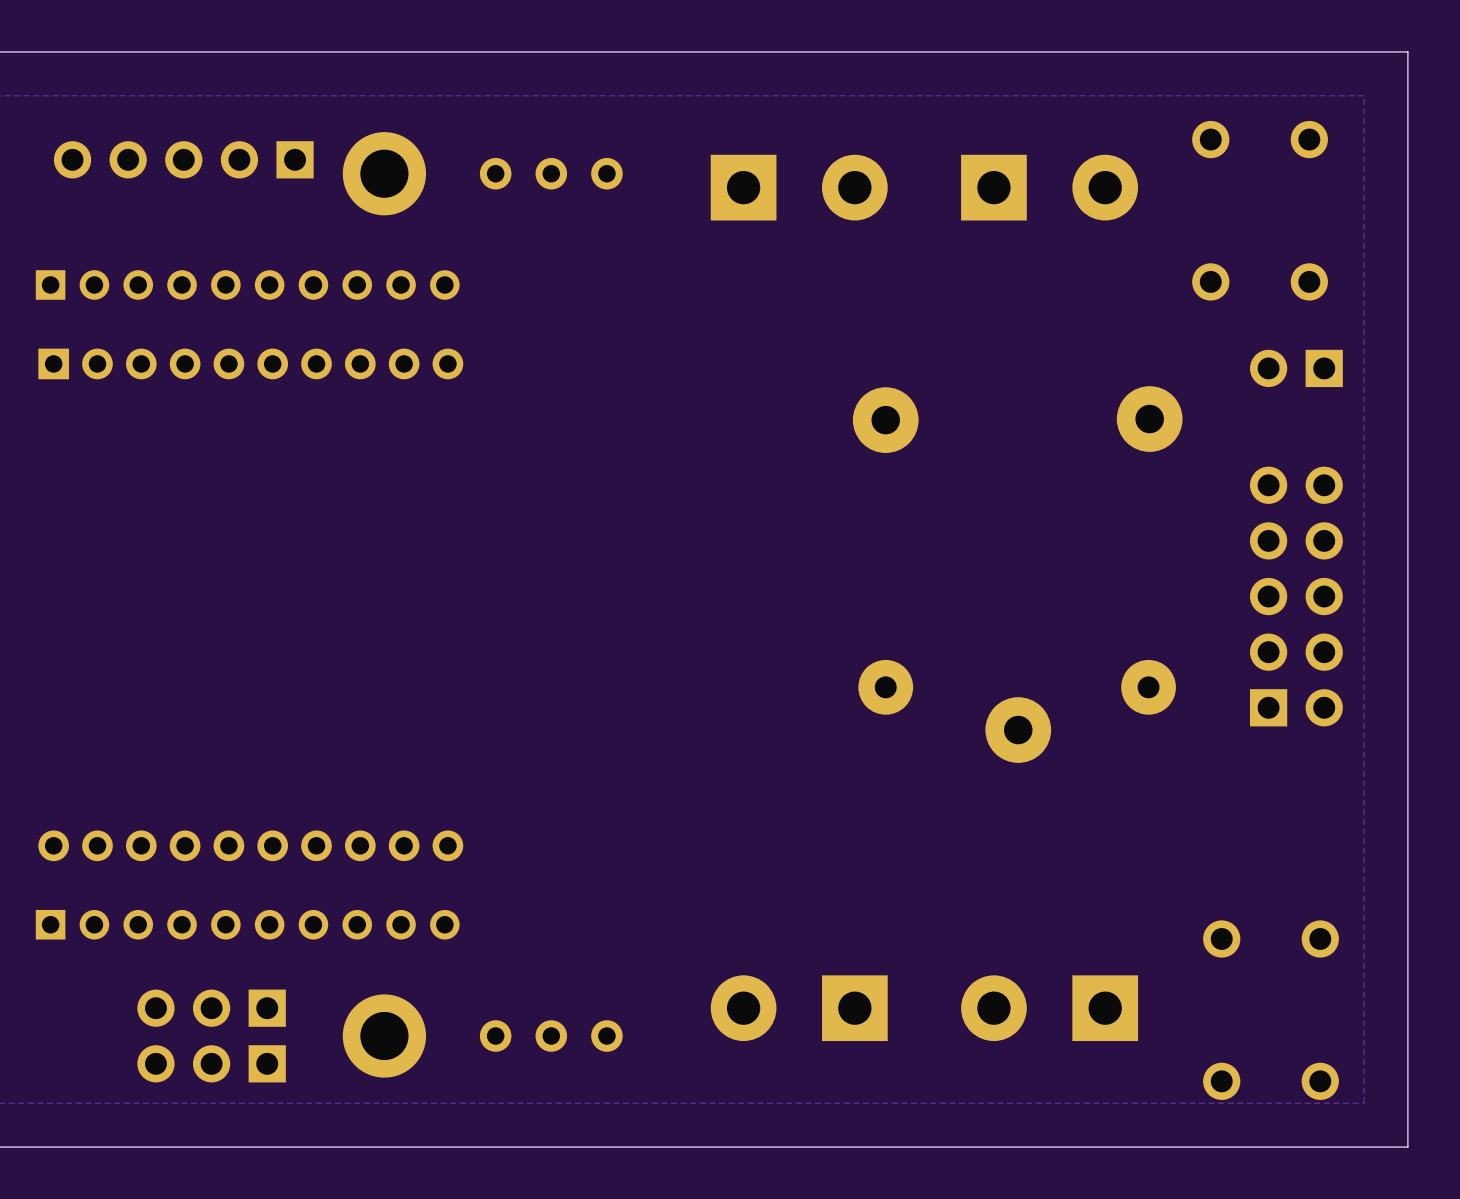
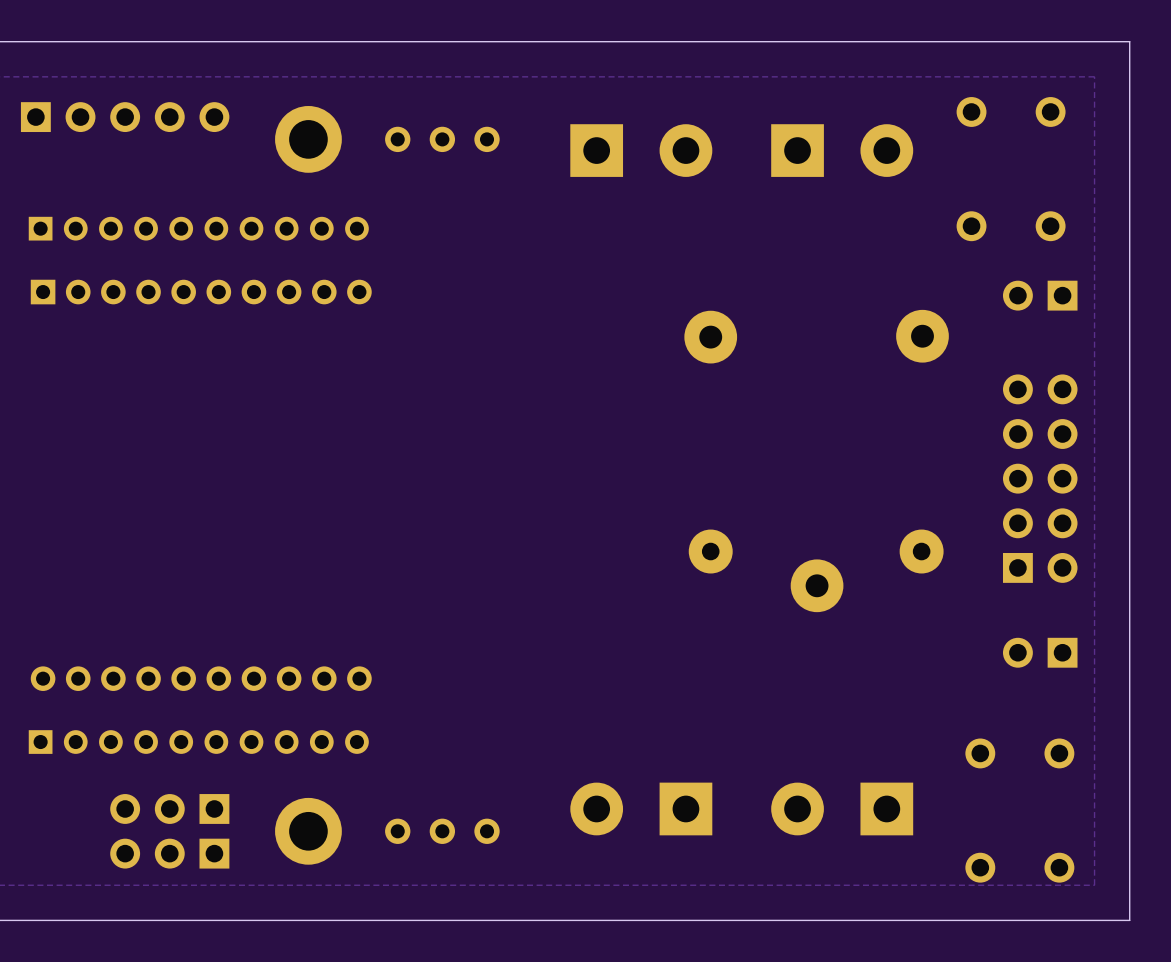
part rotation: 0° (183, 159) -> 180° (125, 117)
part: none -> (1040, 652)

